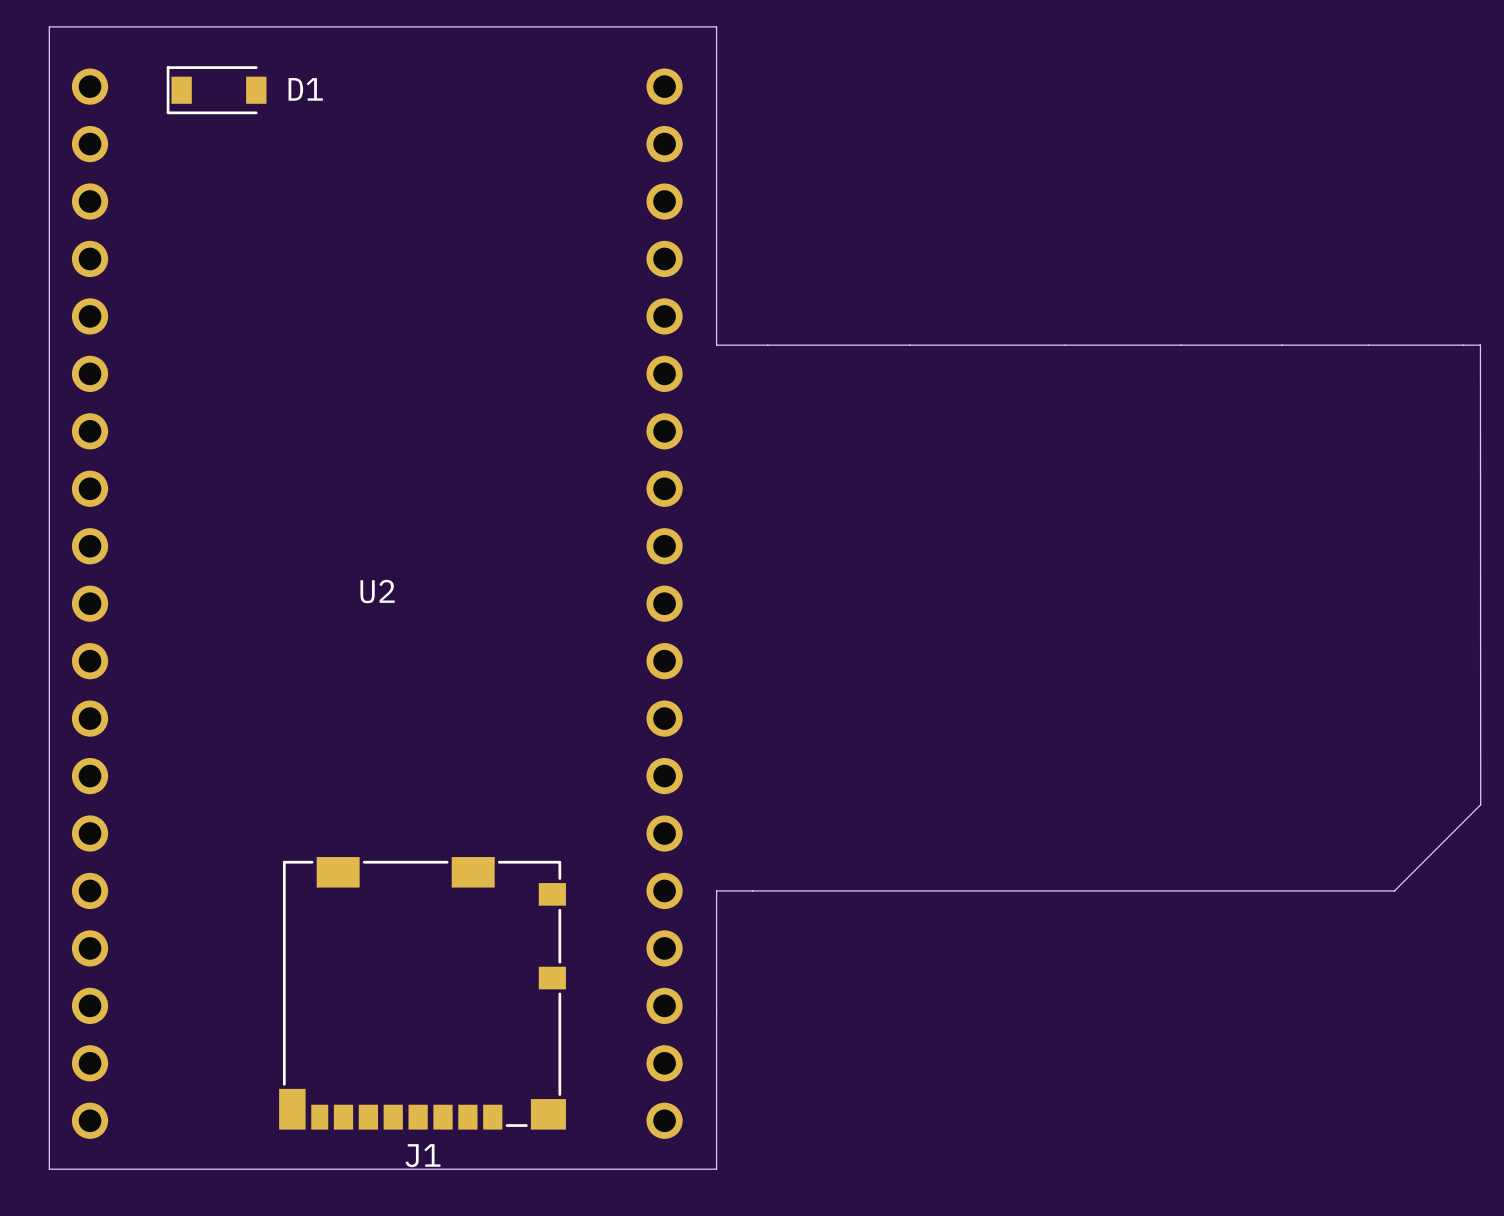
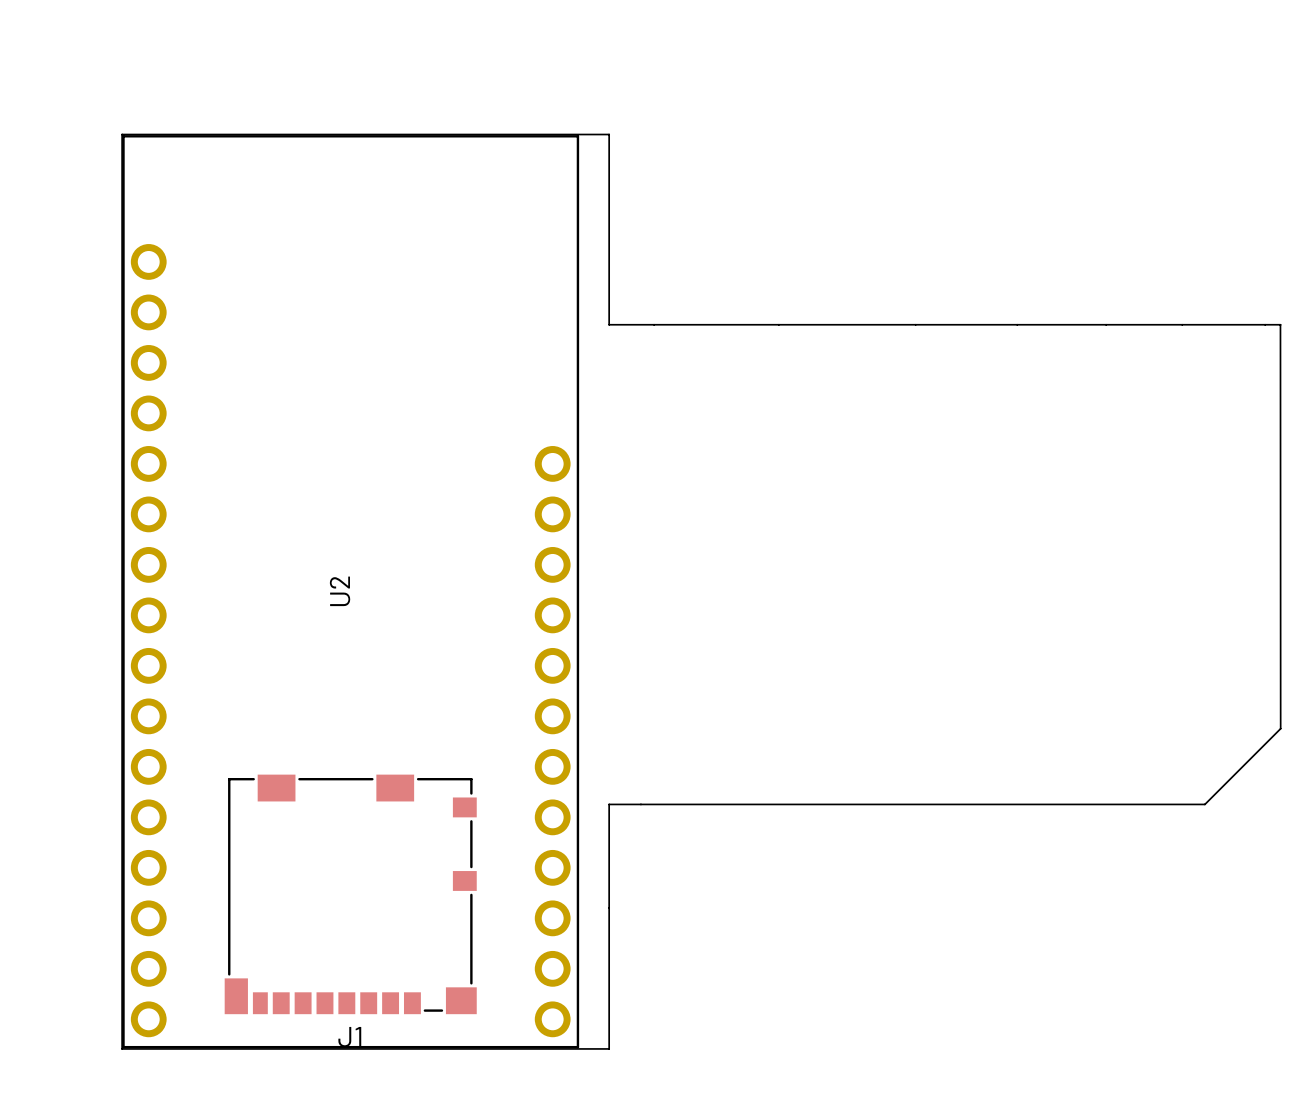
U2 footprint: [71, 68, 683, 1139] -> [122, 135, 580, 1049]
D1: (216, 90) -> none
board edge: (716, 128) (716, 26) (49, 26) (49, 1169) (162, 1169) -> (609, 134) (122, 134) (122, 1048)

